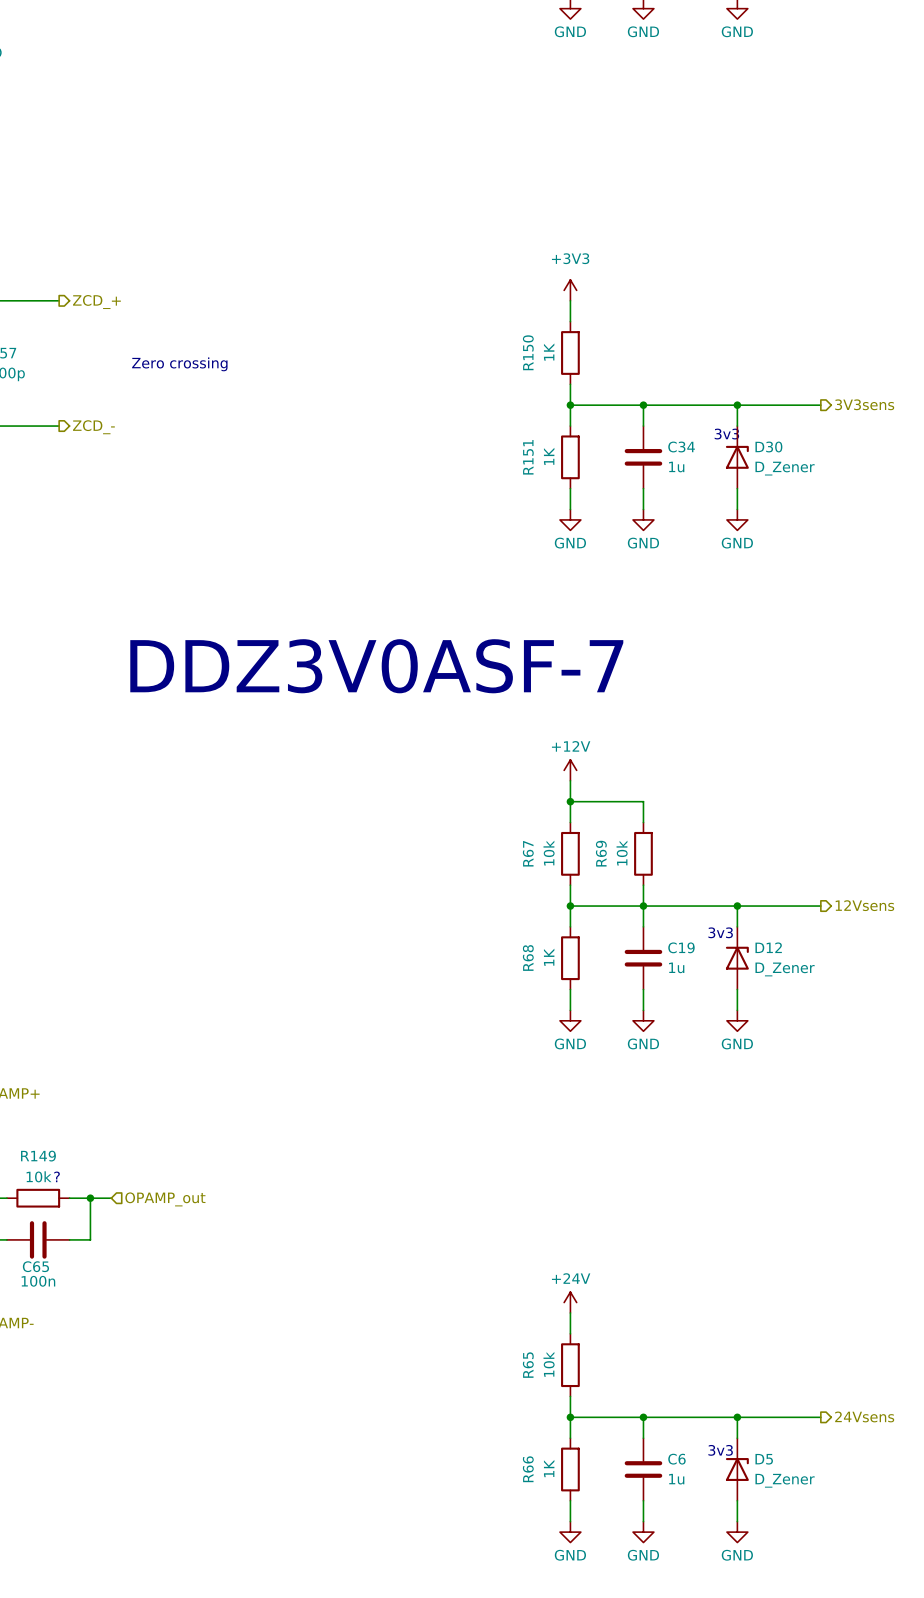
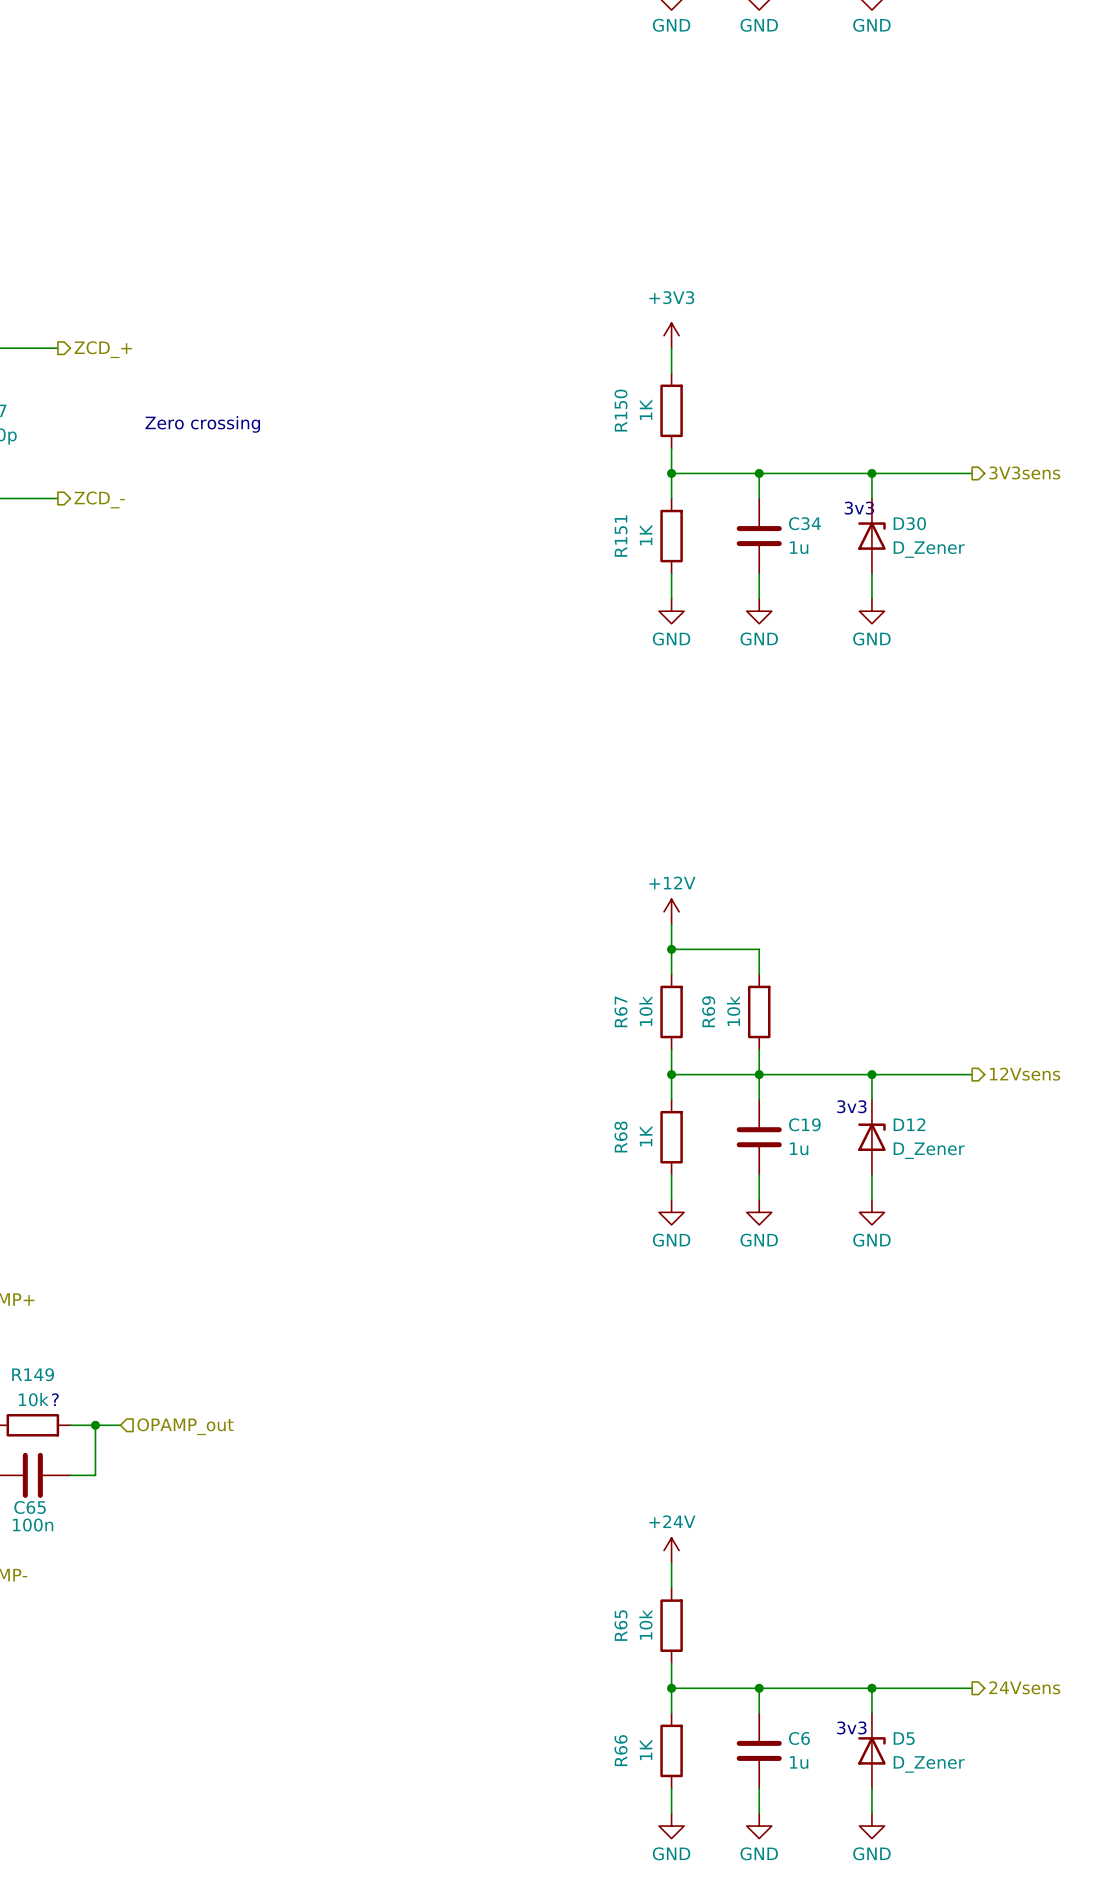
text: DDZ3V0ASF-7 (376, 666) -> none

